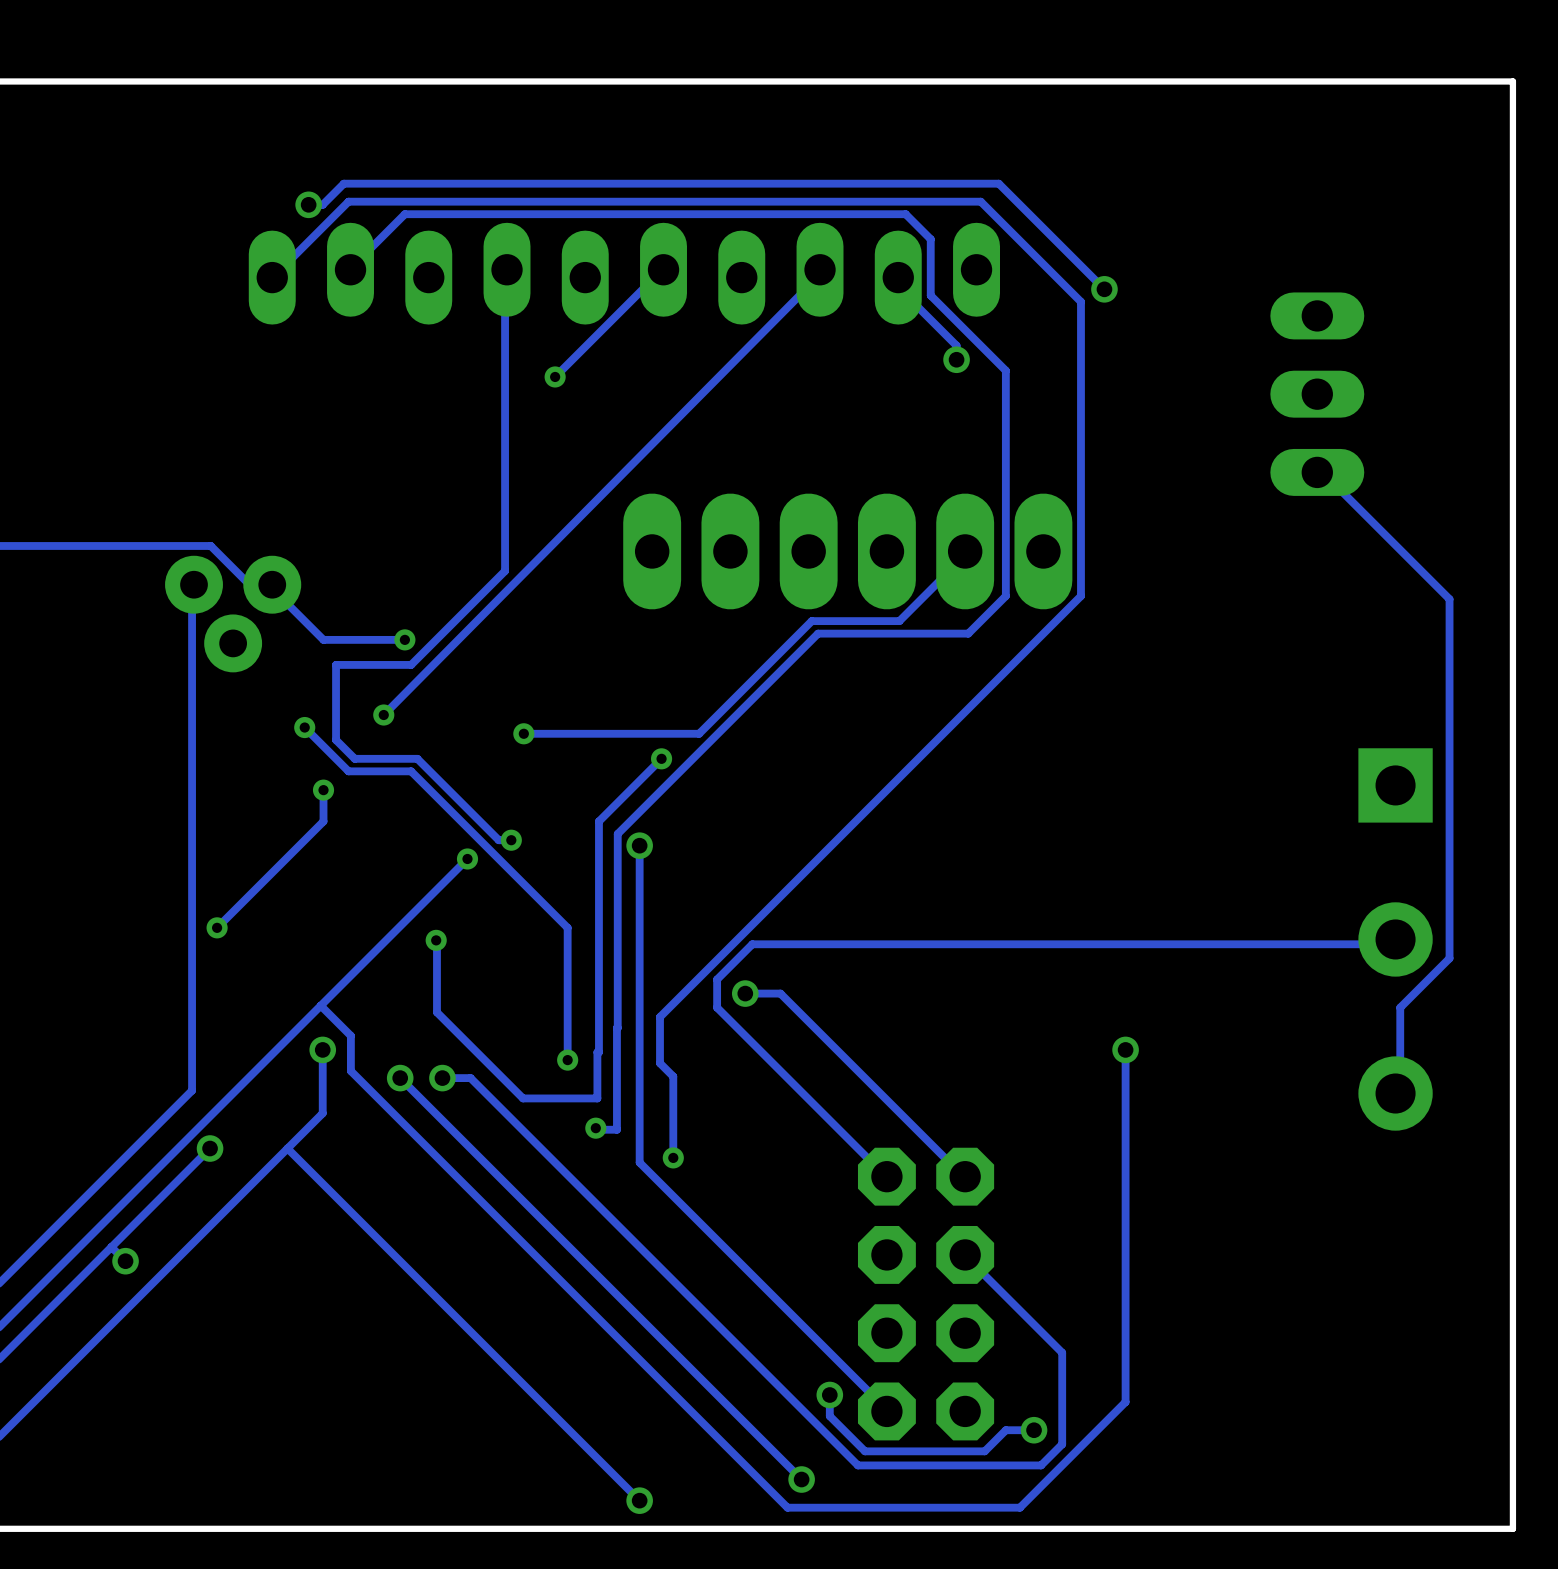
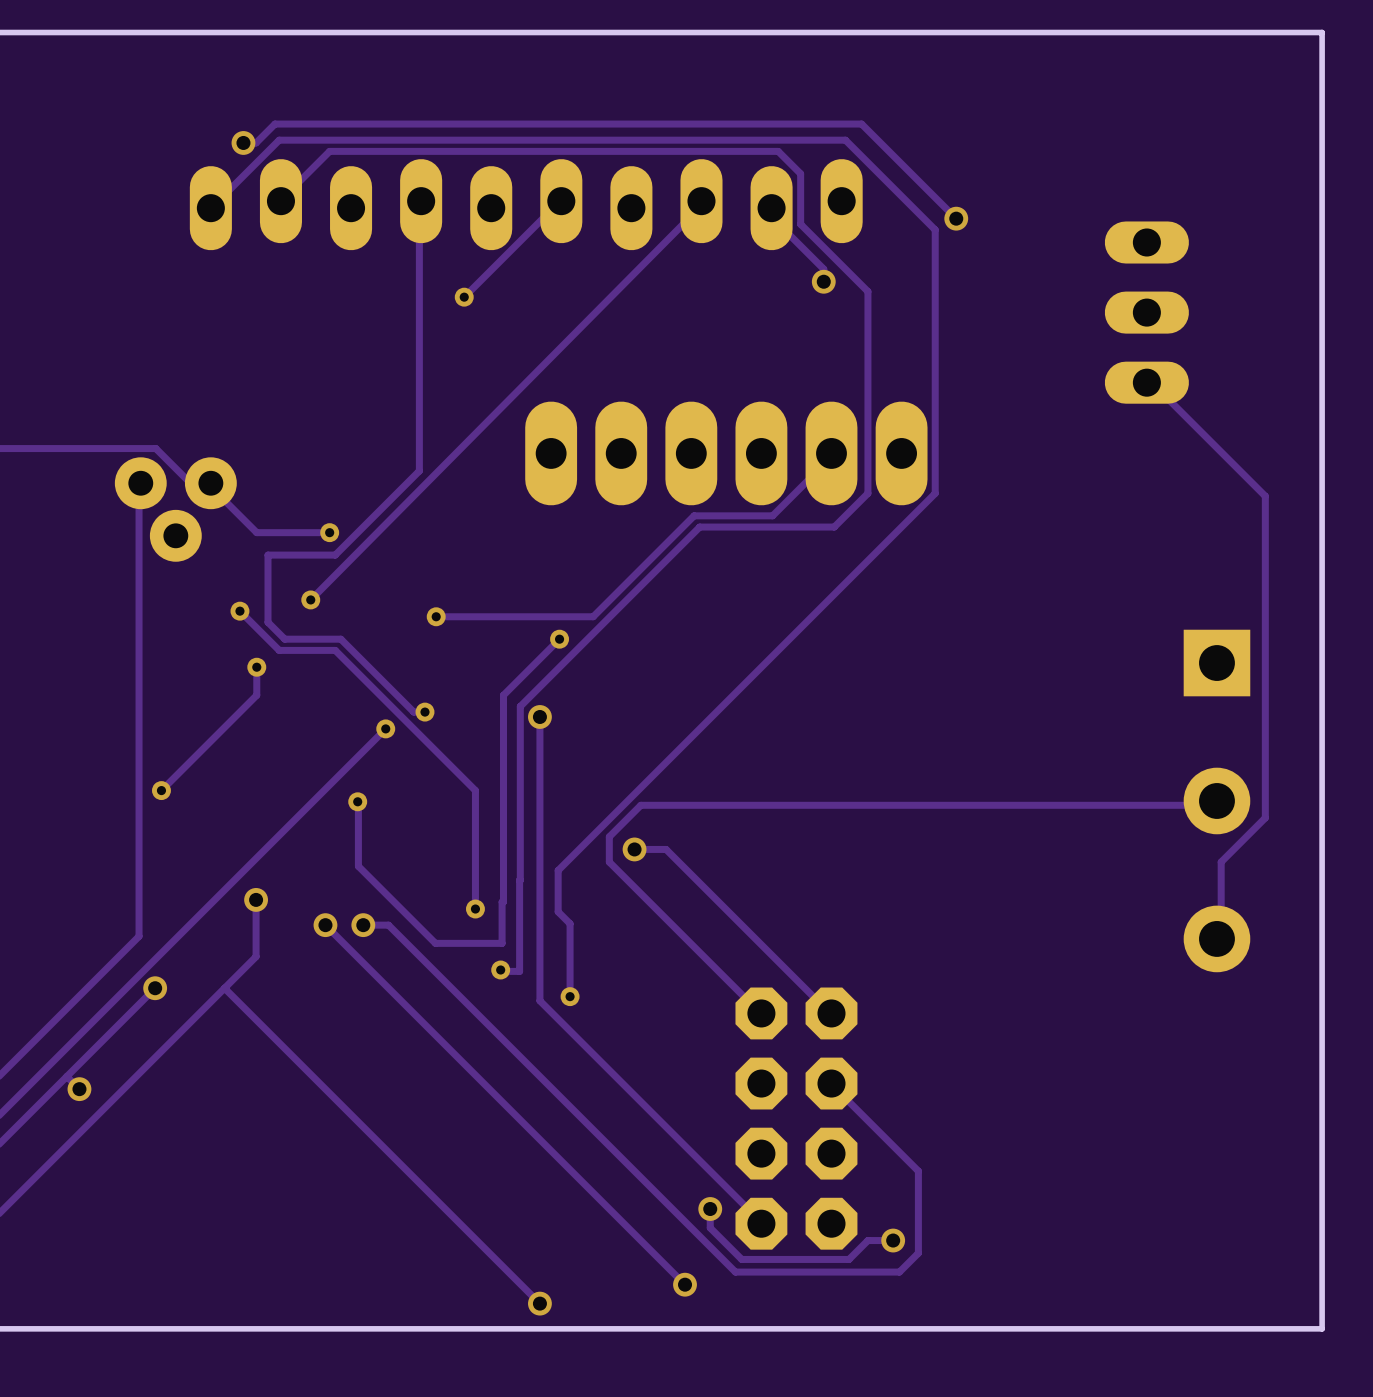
track: (320, 1005) (350, 1035) (350, 1071) (787, 1507) (1019, 1507) (1125, 1402) (1125, 1049) -> none
via: (1125, 1049) -> none

